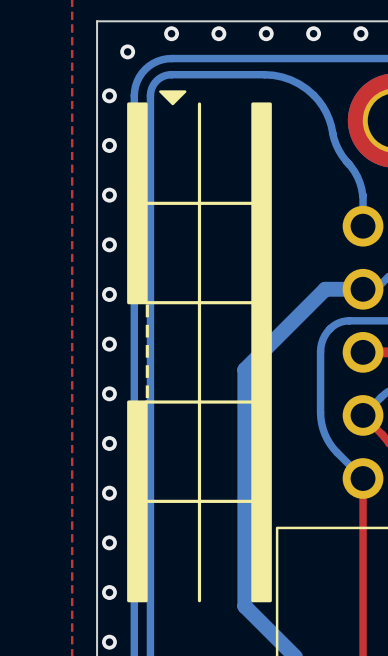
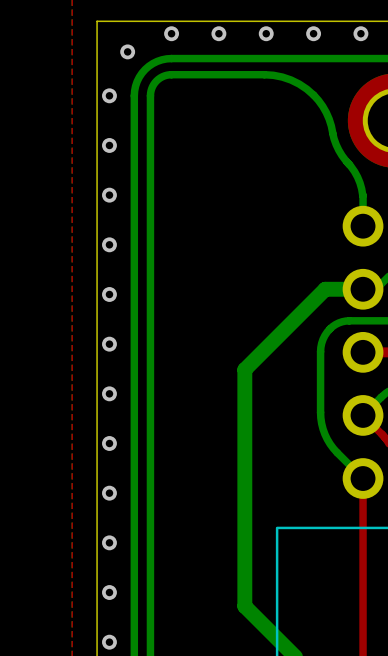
drawing: [127, 90, 187, 305] -> none
drawing: [251, 102, 272, 603] -> none
line: (199, 104) (199, 600) -> none
line: (146, 203) (252, 203) -> none
line: (146, 302) (252, 302) -> none
line: (147, 304) (147, 403) -> none
drawing: [127, 400, 148, 603] -> none
line: (146, 402) (252, 402) -> none
line: (146, 501) (252, 501) -> none

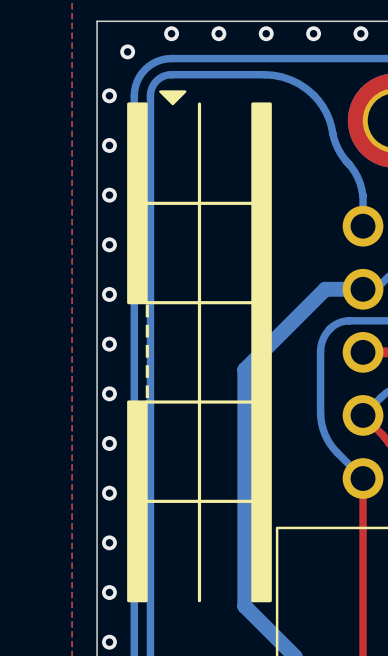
drawing: none -> [127, 90, 187, 305]
drawing: none -> [251, 102, 272, 603]
line: none -> (199, 104) (199, 600)
line: none -> (146, 203) (252, 203)
line: none -> (146, 302) (252, 302)
line: none -> (147, 304) (147, 403)
drawing: none -> [127, 400, 148, 603]
line: none -> (146, 402) (252, 402)
line: none -> (146, 501) (252, 501)

